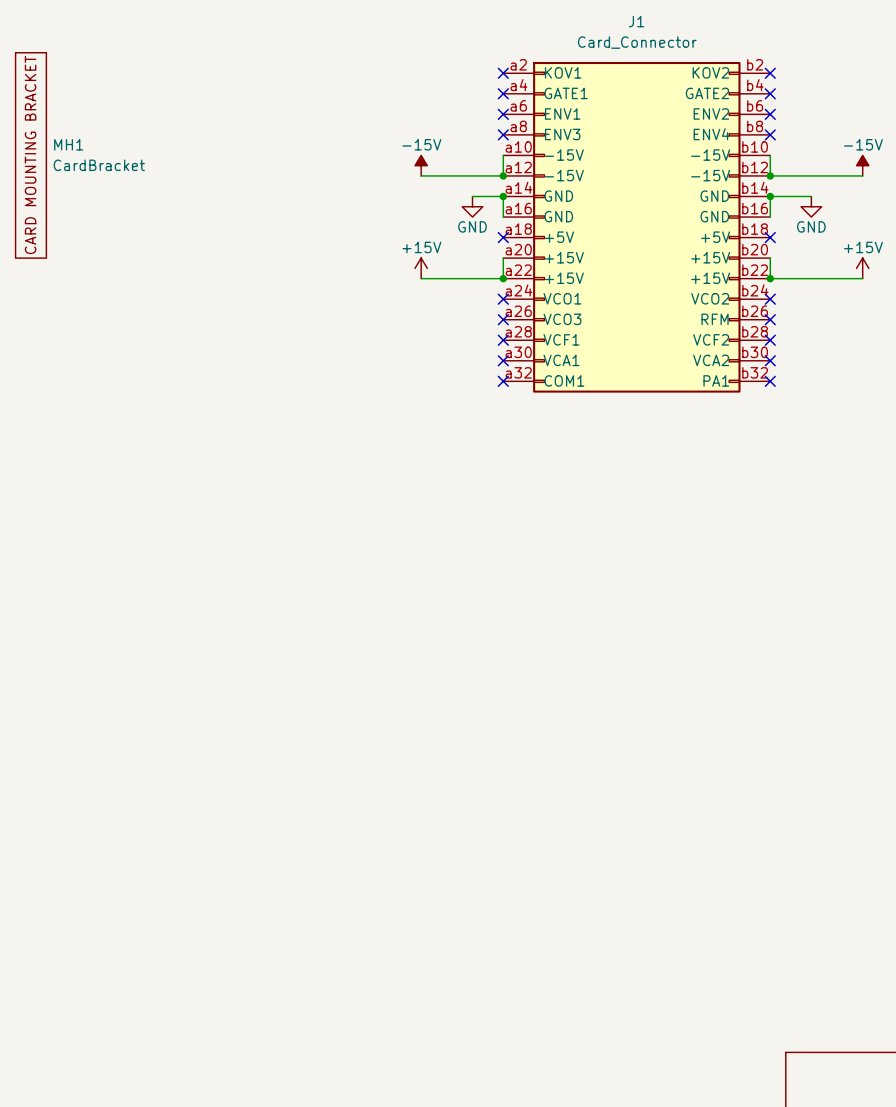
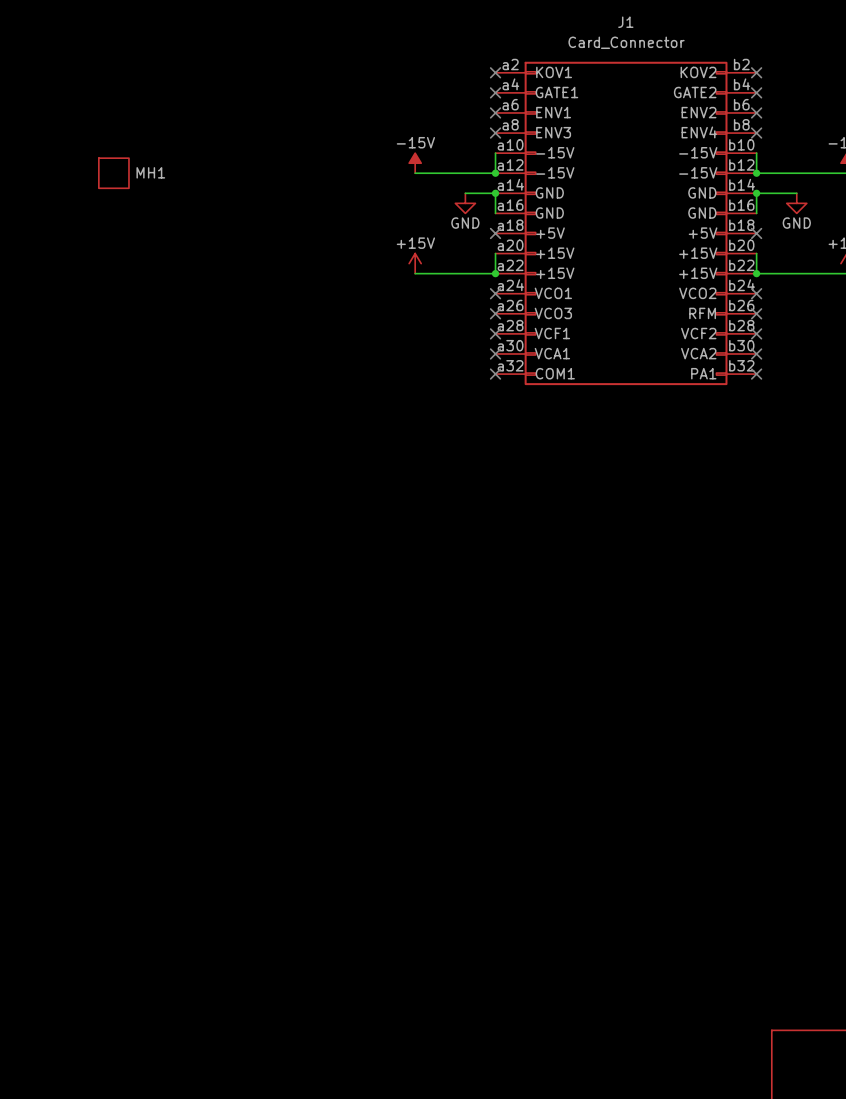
MH1 symbol: [15, 52, 47, 259] -> [98, 158, 129, 189]
MH1 value: CardBracket (99, 165) -> none

